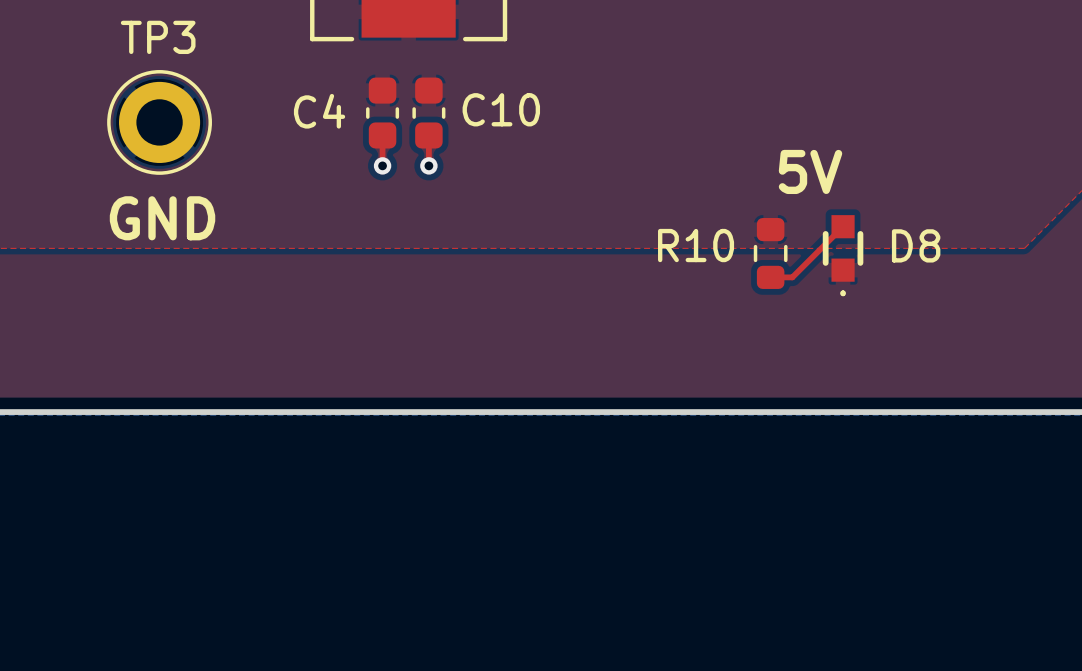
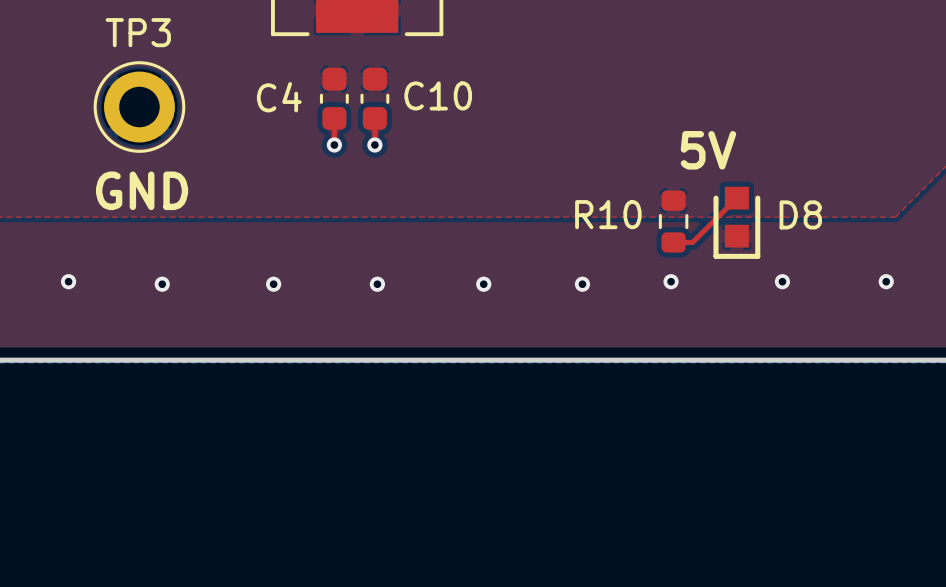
D8 footprint: [822, 215, 864, 297] -> [713, 186, 761, 259]
via: none -> (68, 281)
via: none -> (671, 281)
via: none -> (782, 281)
via: none -> (886, 281)
via: none -> (162, 284)
via: none -> (273, 284)
via: none -> (377, 284)
via: none -> (483, 284)
via: none -> (582, 284)

